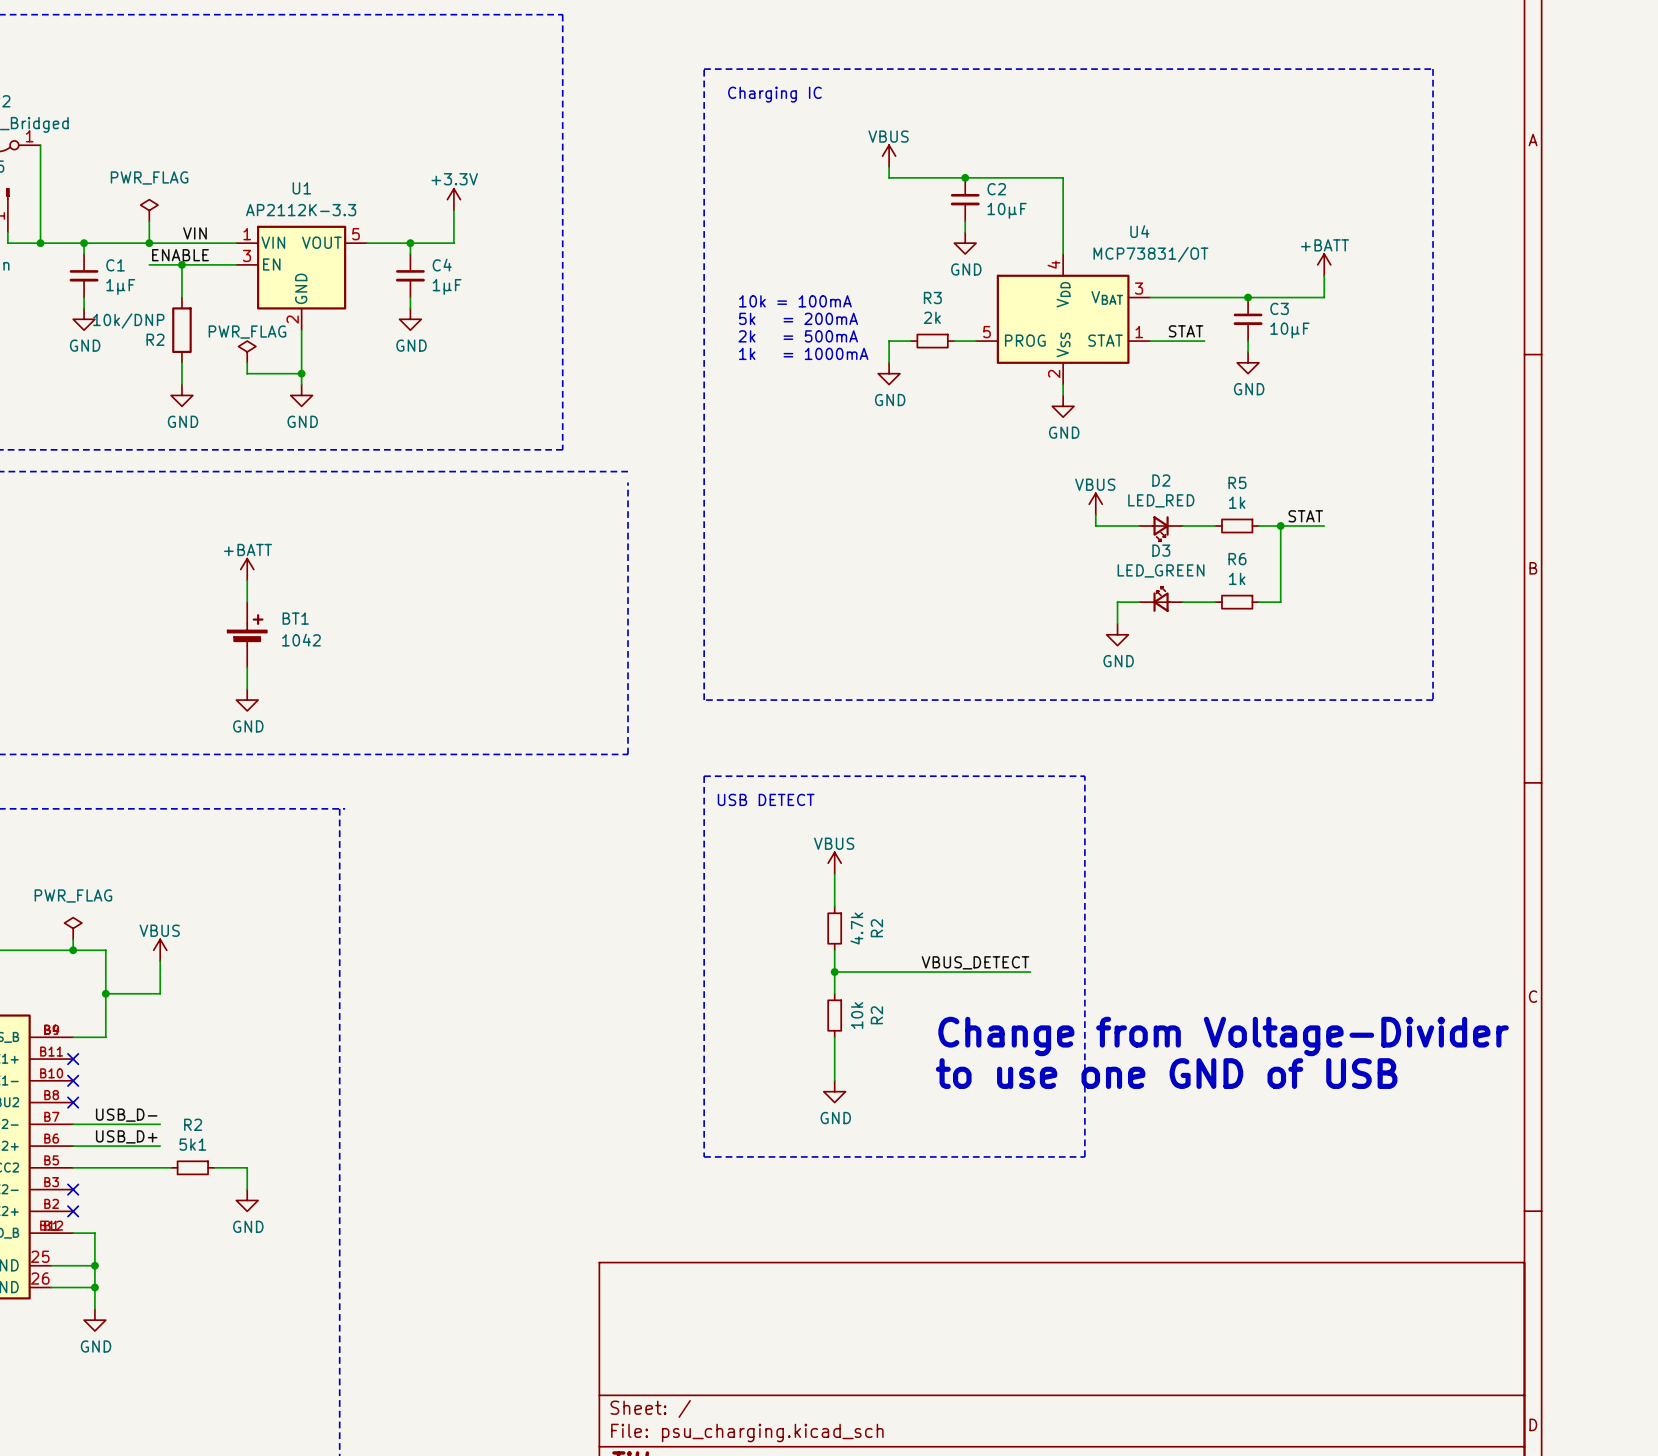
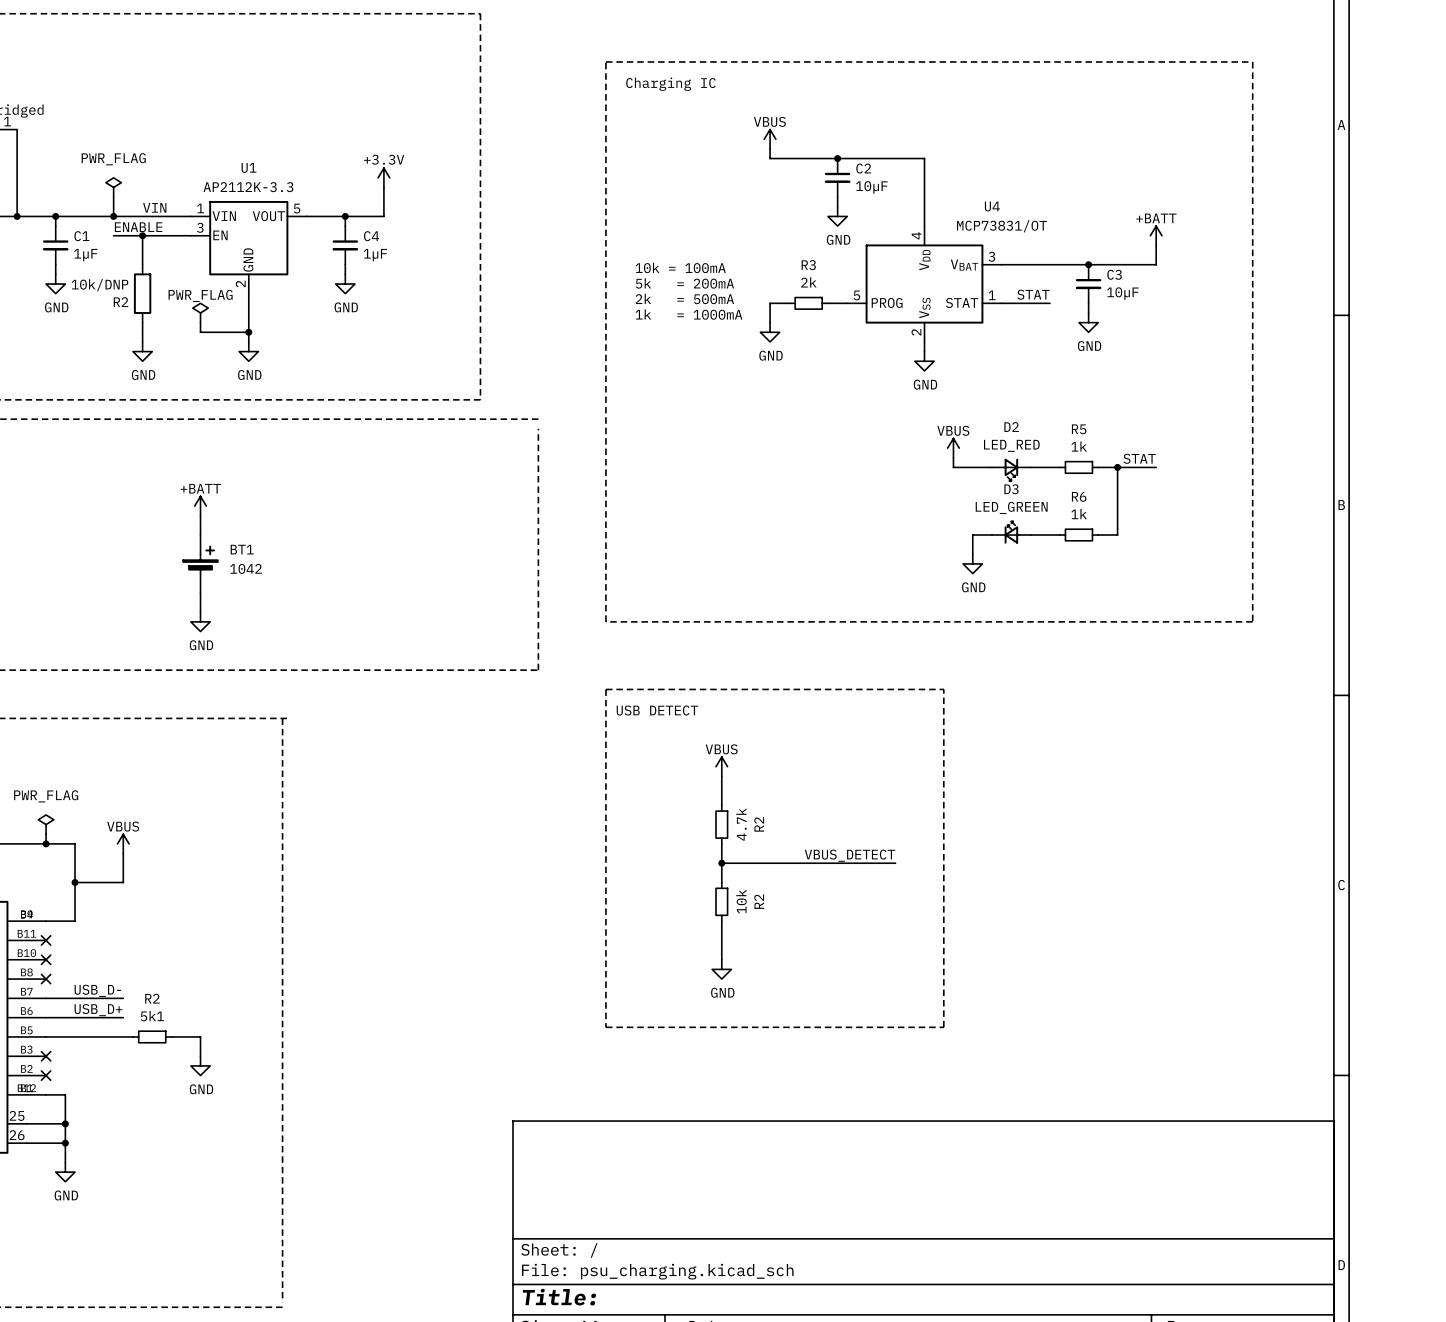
text: Change from Voltage-Divider (1223, 1036) -> none
text: to use one GND of USB (1166, 1073) -> none

